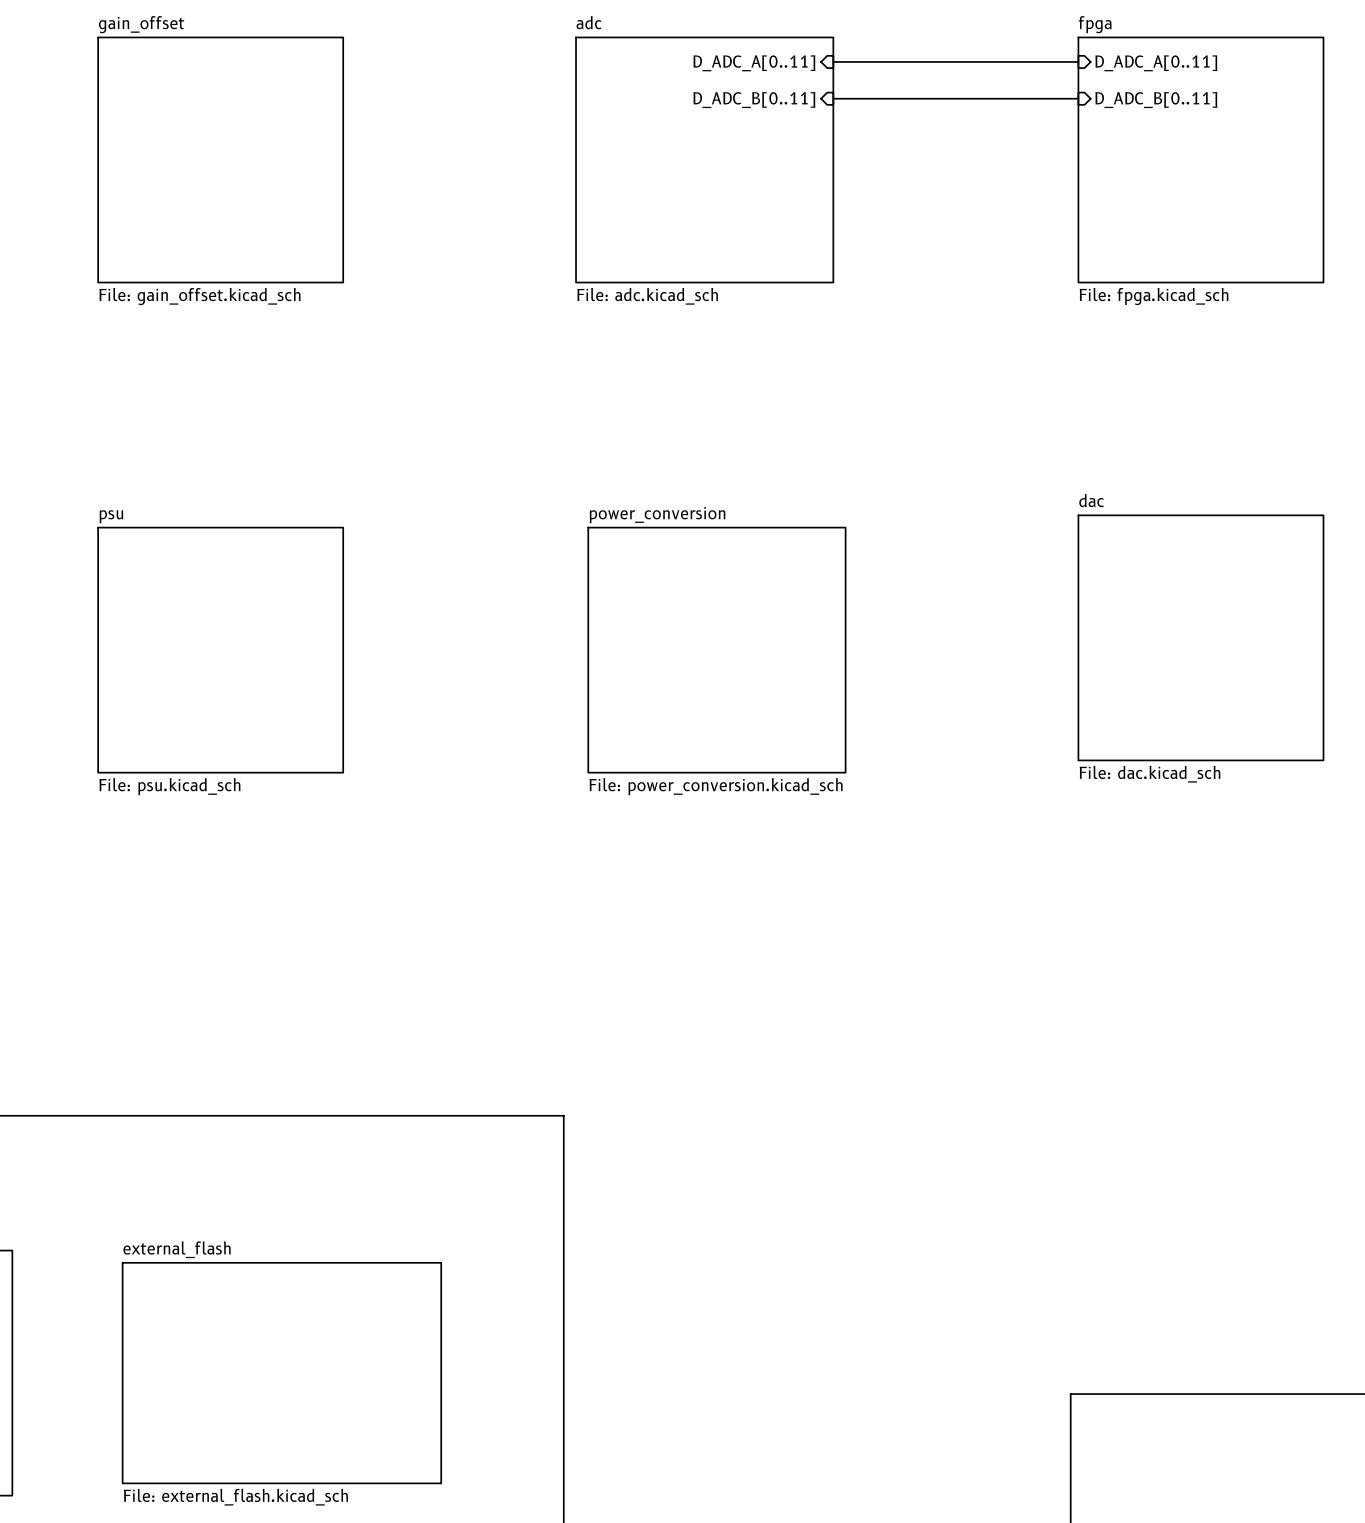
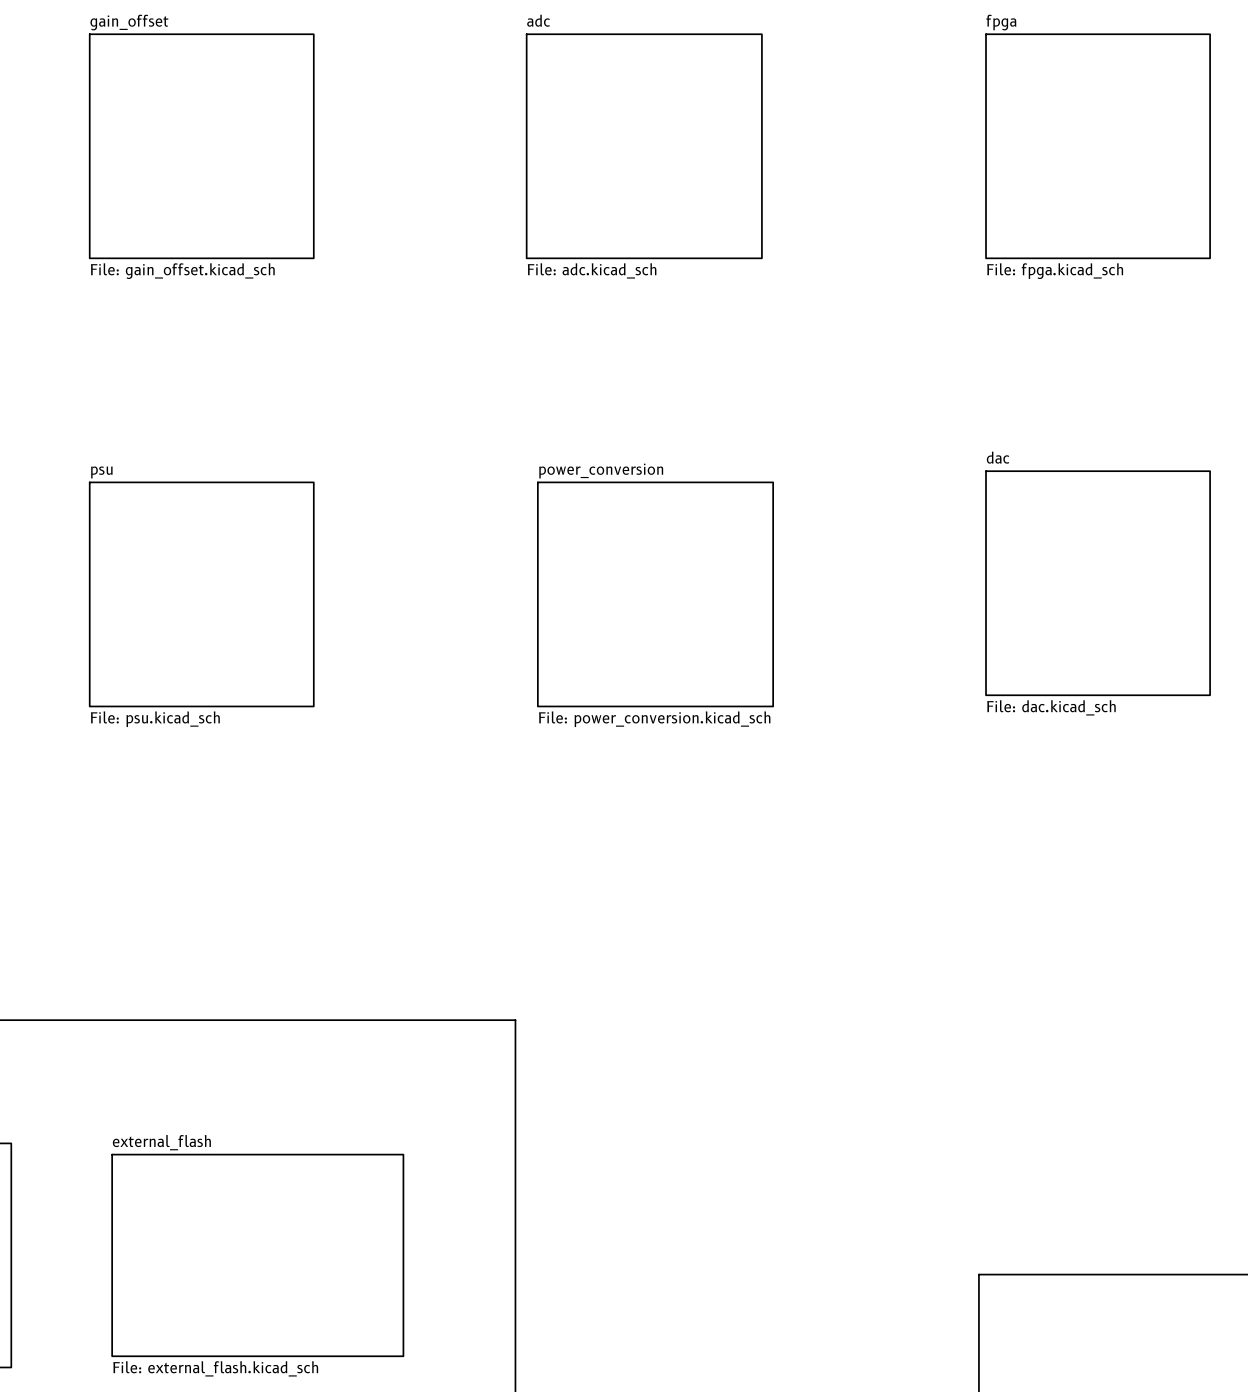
bus: (833, 61) (1078, 61) -> none
sheet pin: D_ADC_A[0..11] (754, 63) -> none
sheet pin: D_ADC_A[0..11] (1156, 63) -> none
bus: (833, 98) (1078, 98) -> none
sheet pin: D_ADC_B[0..11] (754, 100) -> none
sheet pin: D_ADC_B[0..11] (1156, 100) -> none

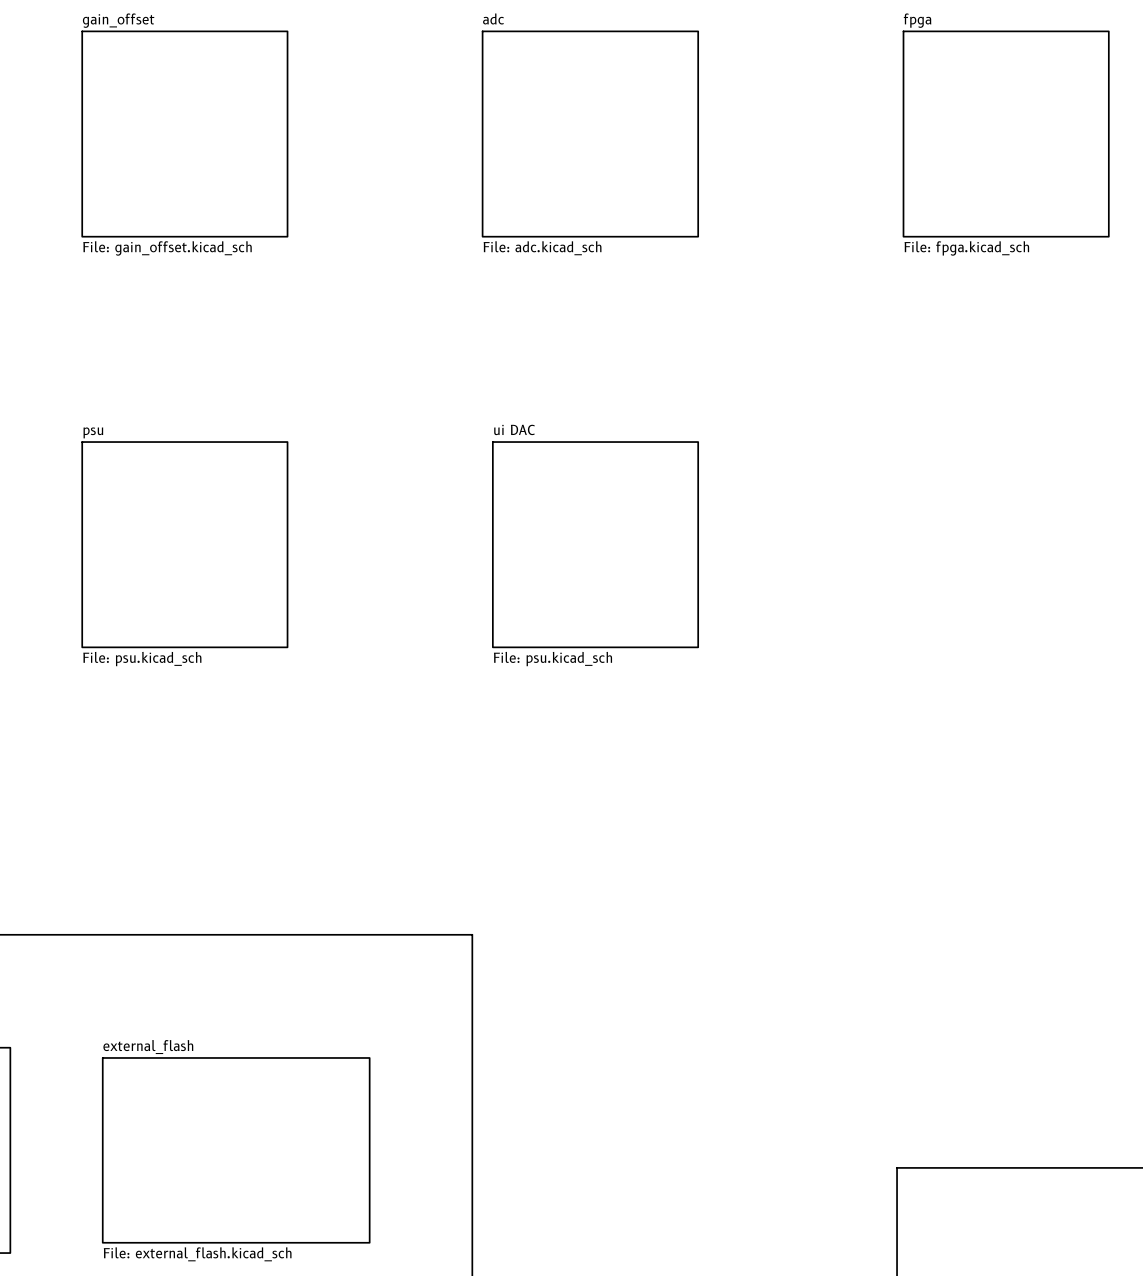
sheet dac: File: dac.kicad_sch (1098, 583) -> none
sheet ui DAC: none -> File: psu.kicad_sch (595, 544)
sheet power_conversion: File: power_conversion.kicad_sch (655, 594) -> none

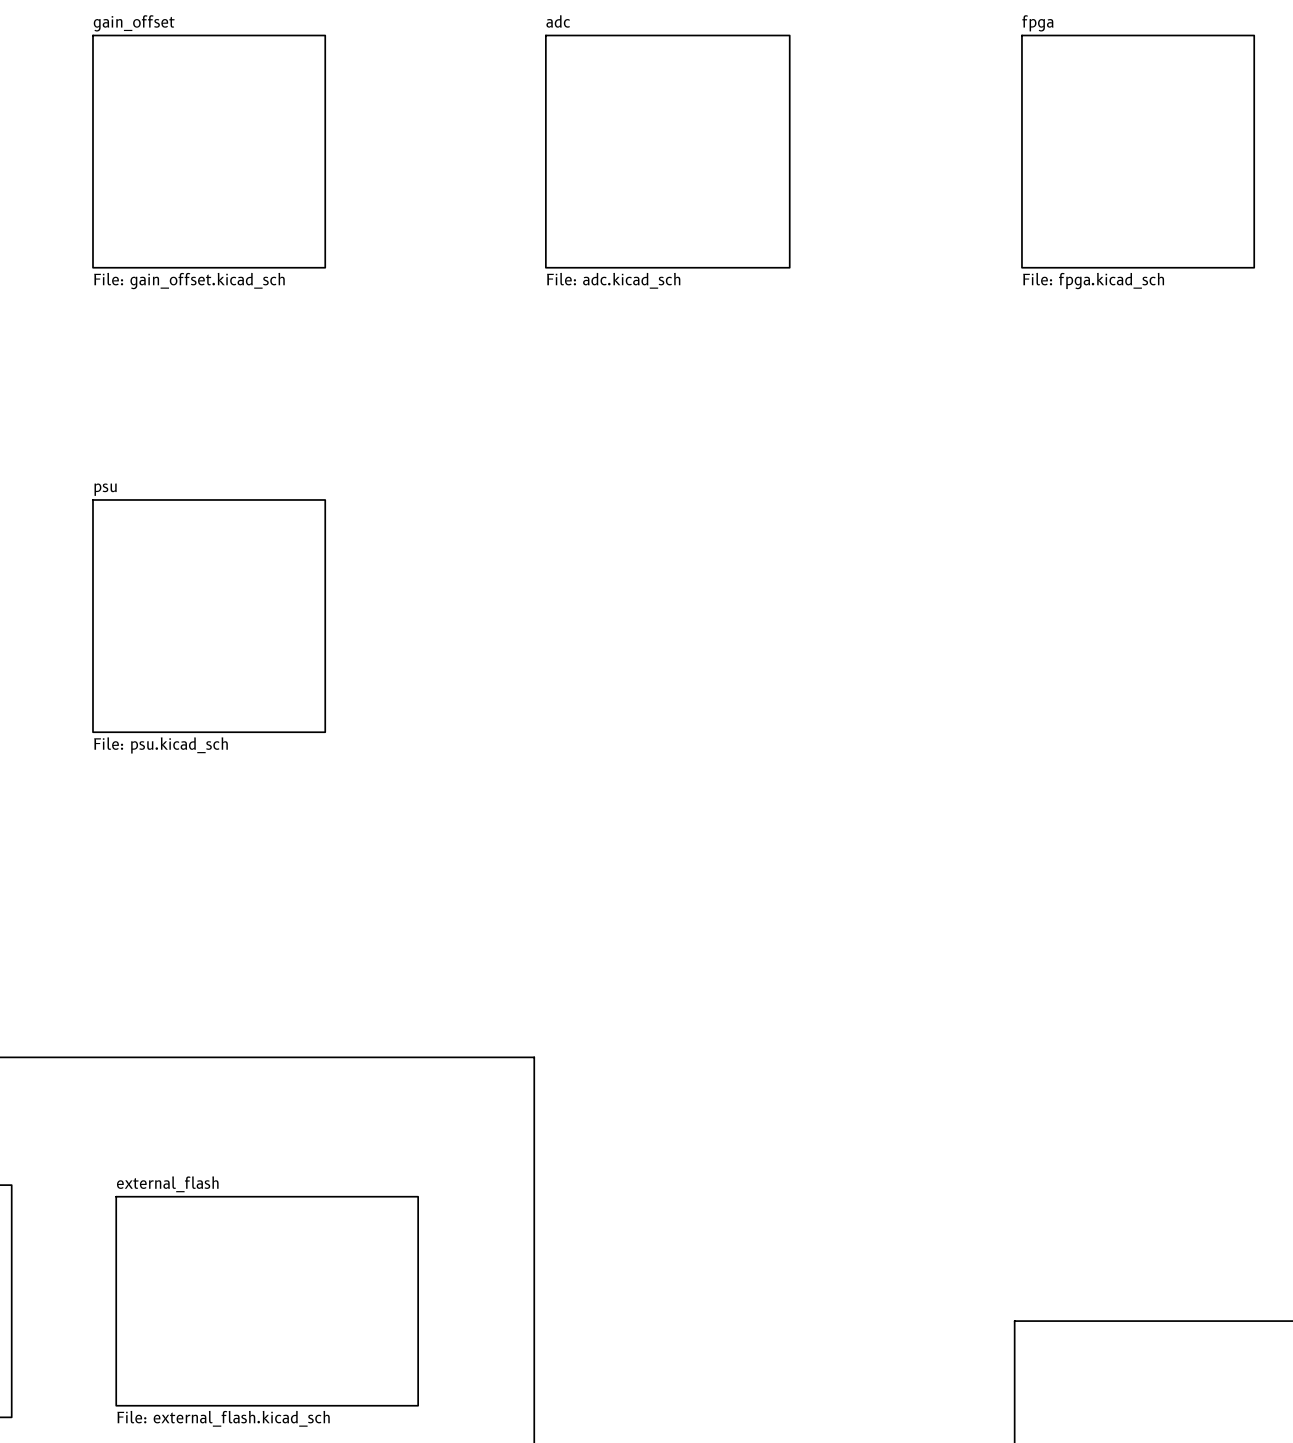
sheet ui DAC: File: psu.kicad_sch (595, 544) -> none

